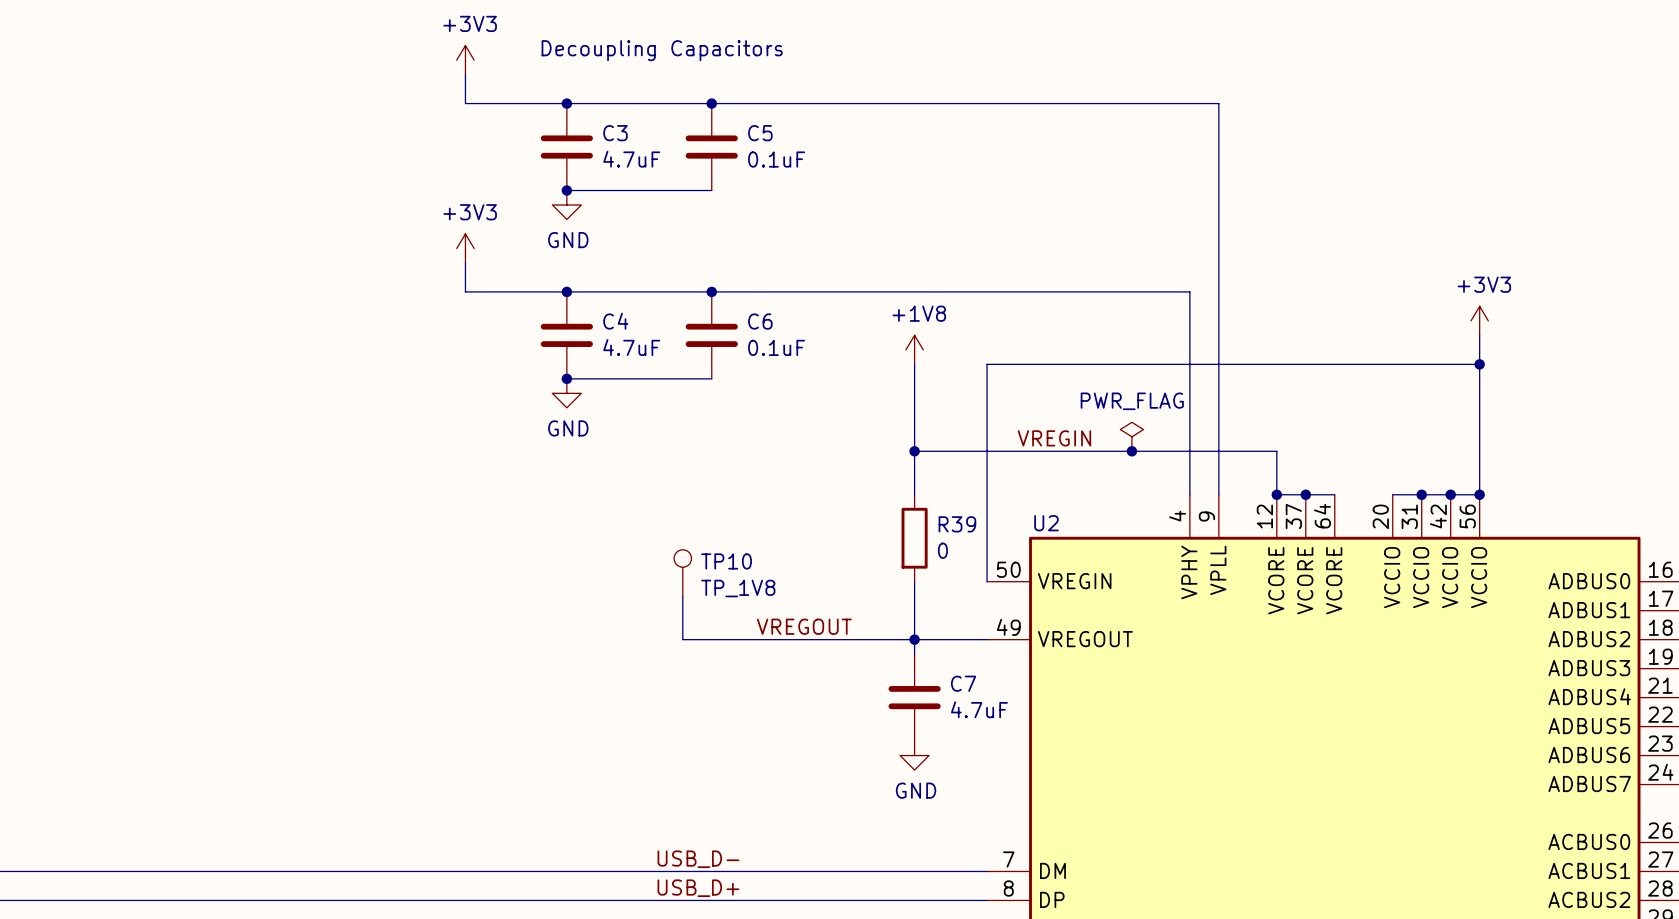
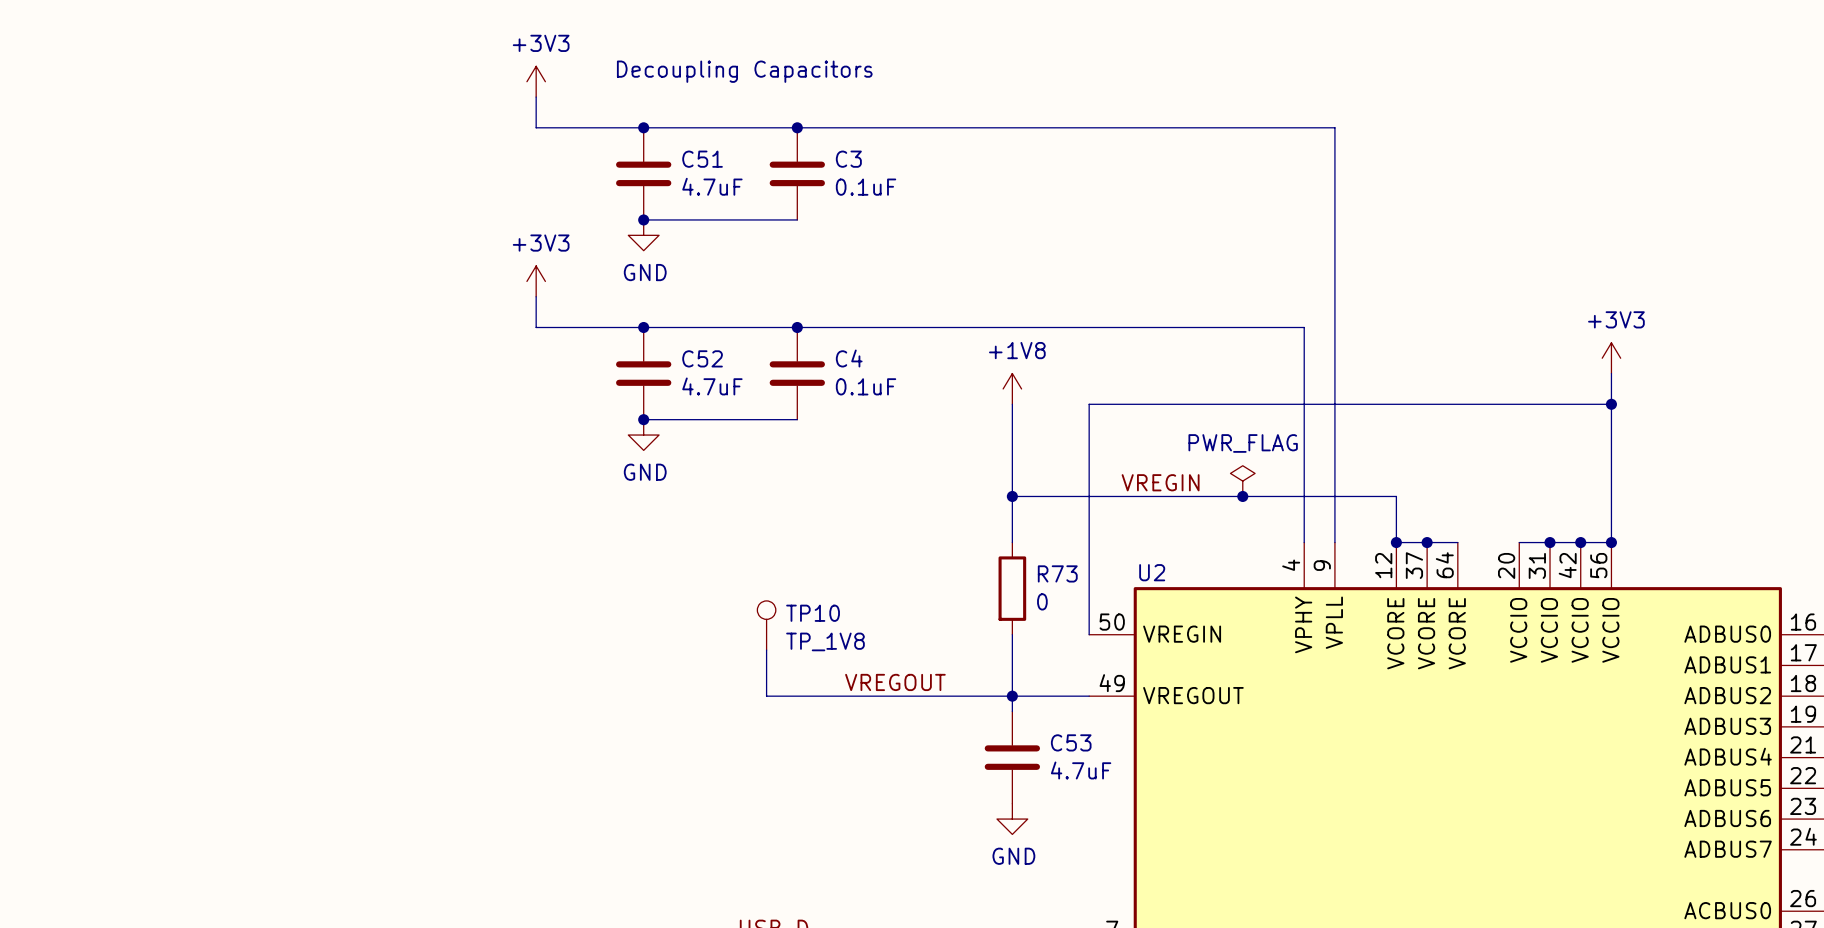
C3 name: C3 (615, 133) -> C51 (702, 159)
C5 name: C5 (760, 133) -> C3 (848, 159)
C4 name: C4 (615, 321) -> C52 (702, 358)
C6 name: C6 (760, 321) -> C4 (849, 358)
R39 name: R39 (957, 524) -> R73 (1057, 573)
C7 name: C7 (963, 683) -> C53 (1071, 742)

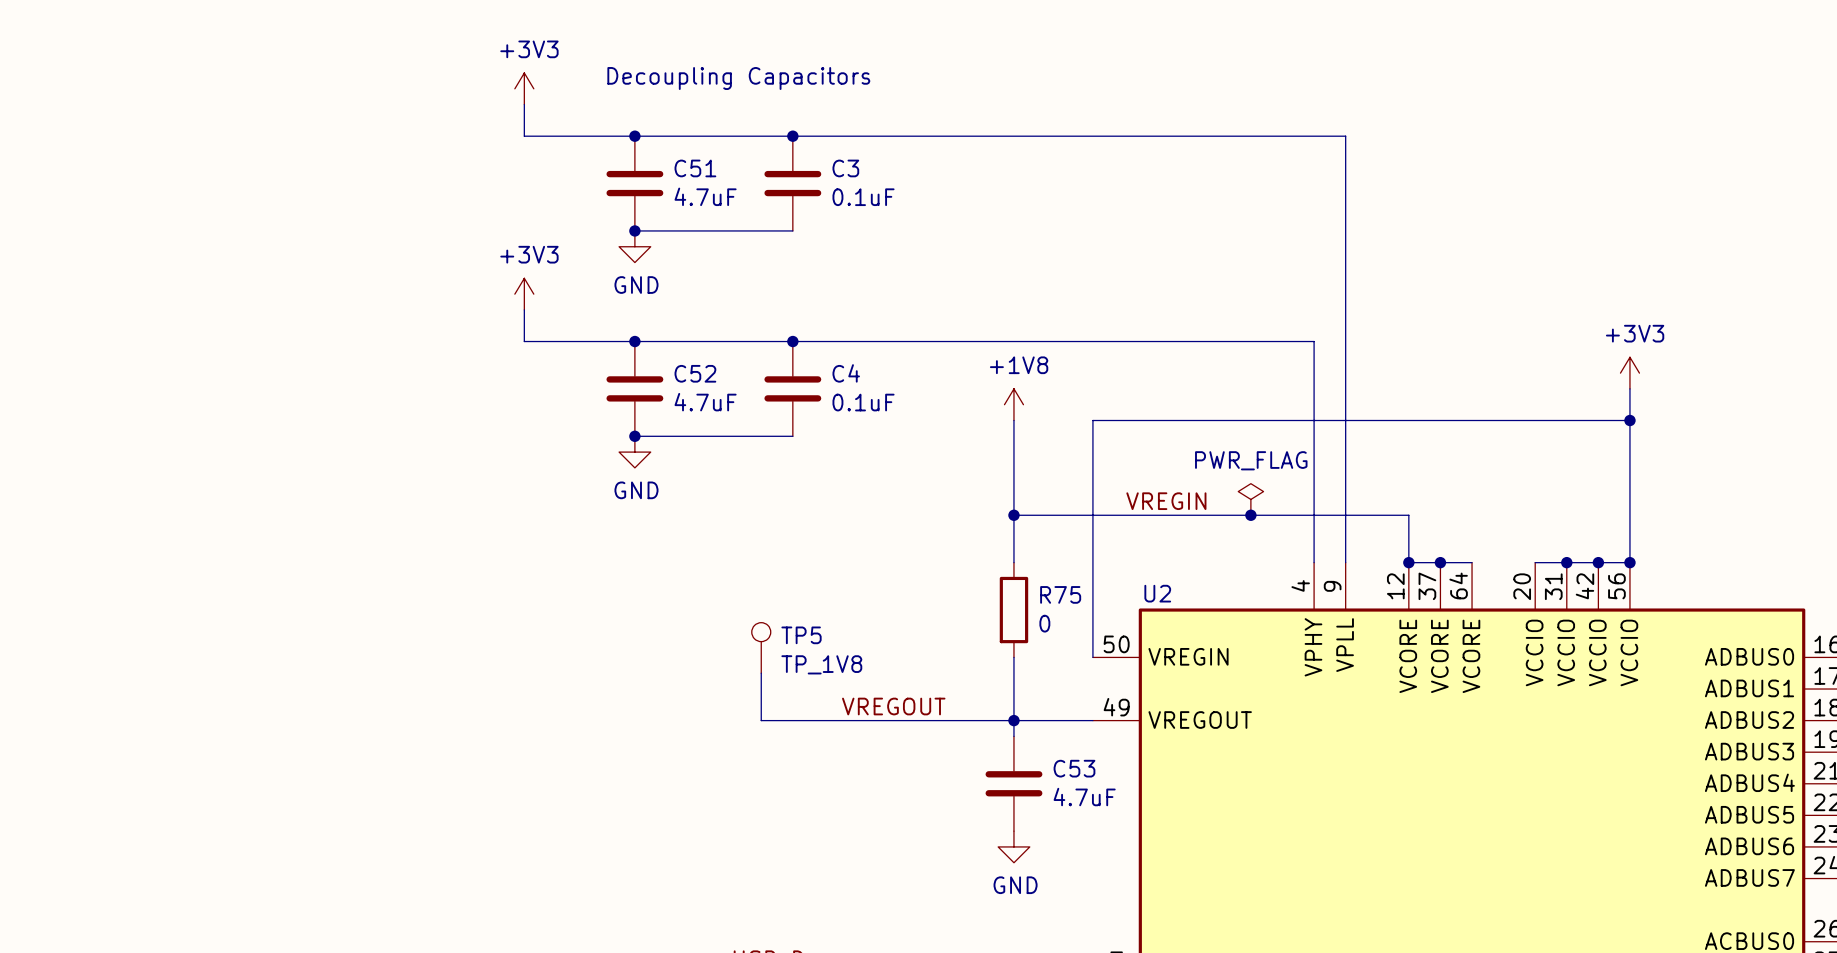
R73 name: R73 (1057, 573) -> R75 (1060, 594)
TP10 name: TP10 (813, 613) -> TP5 (801, 635)

